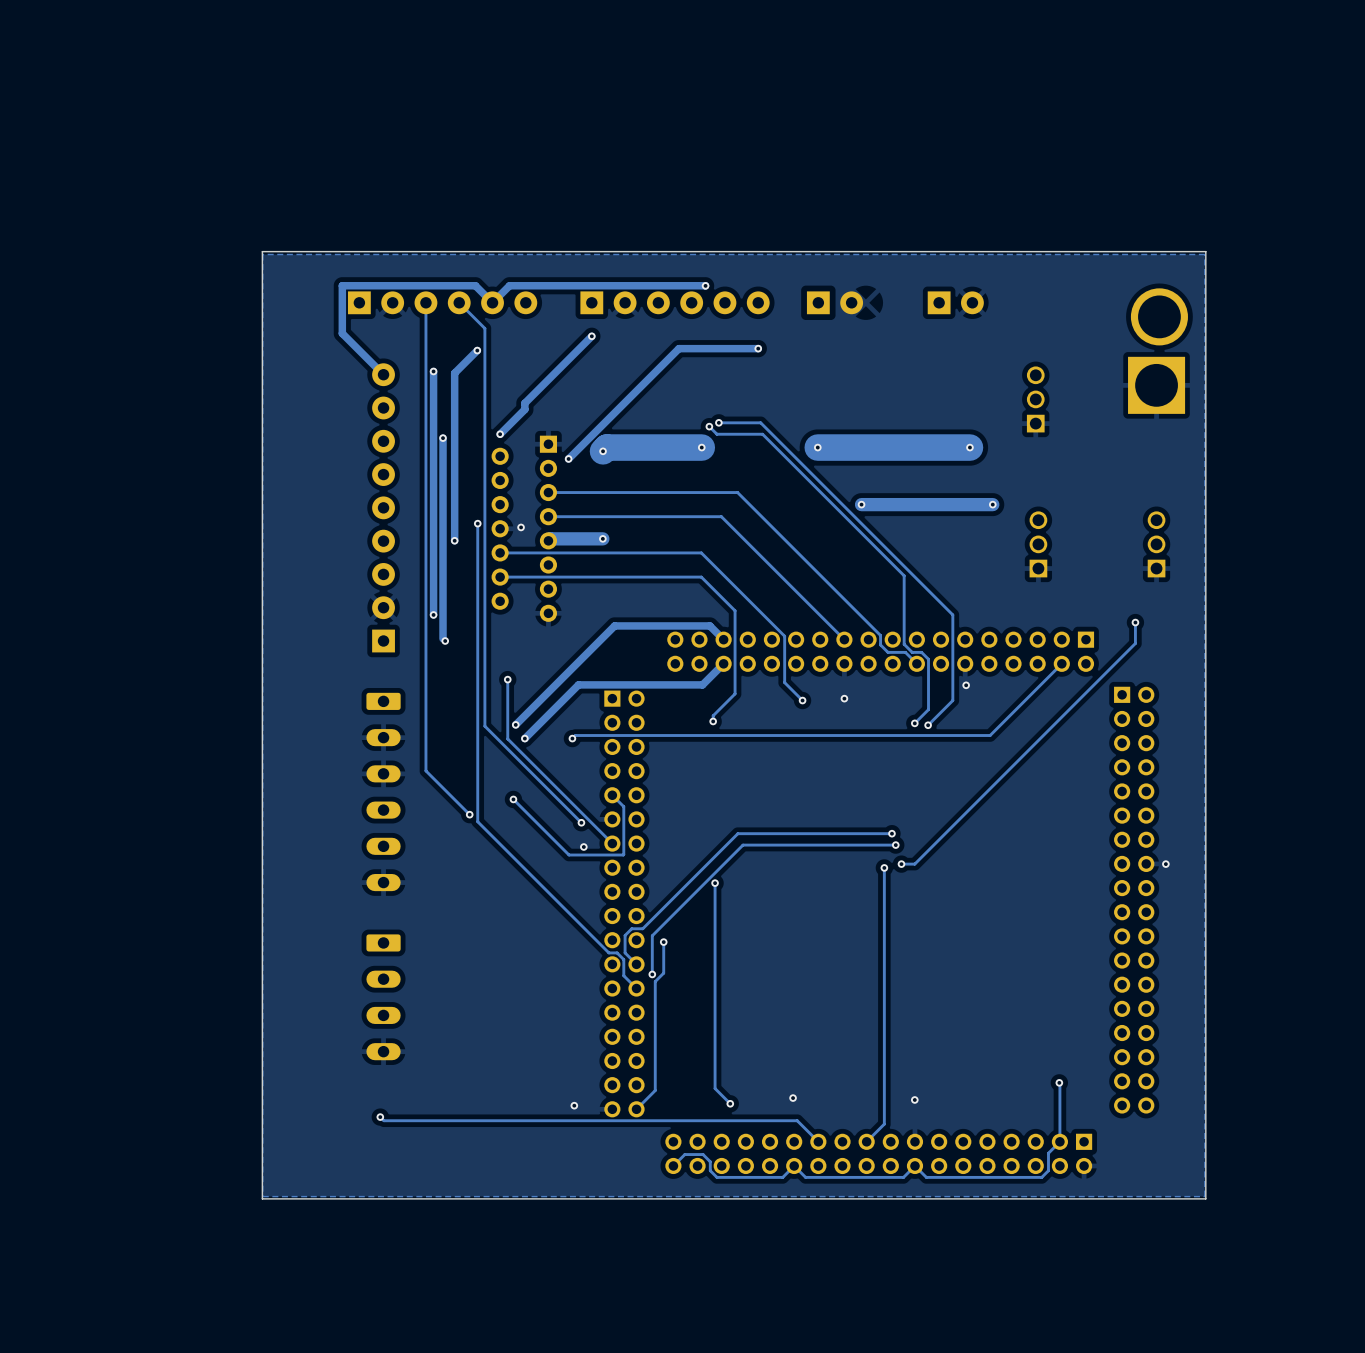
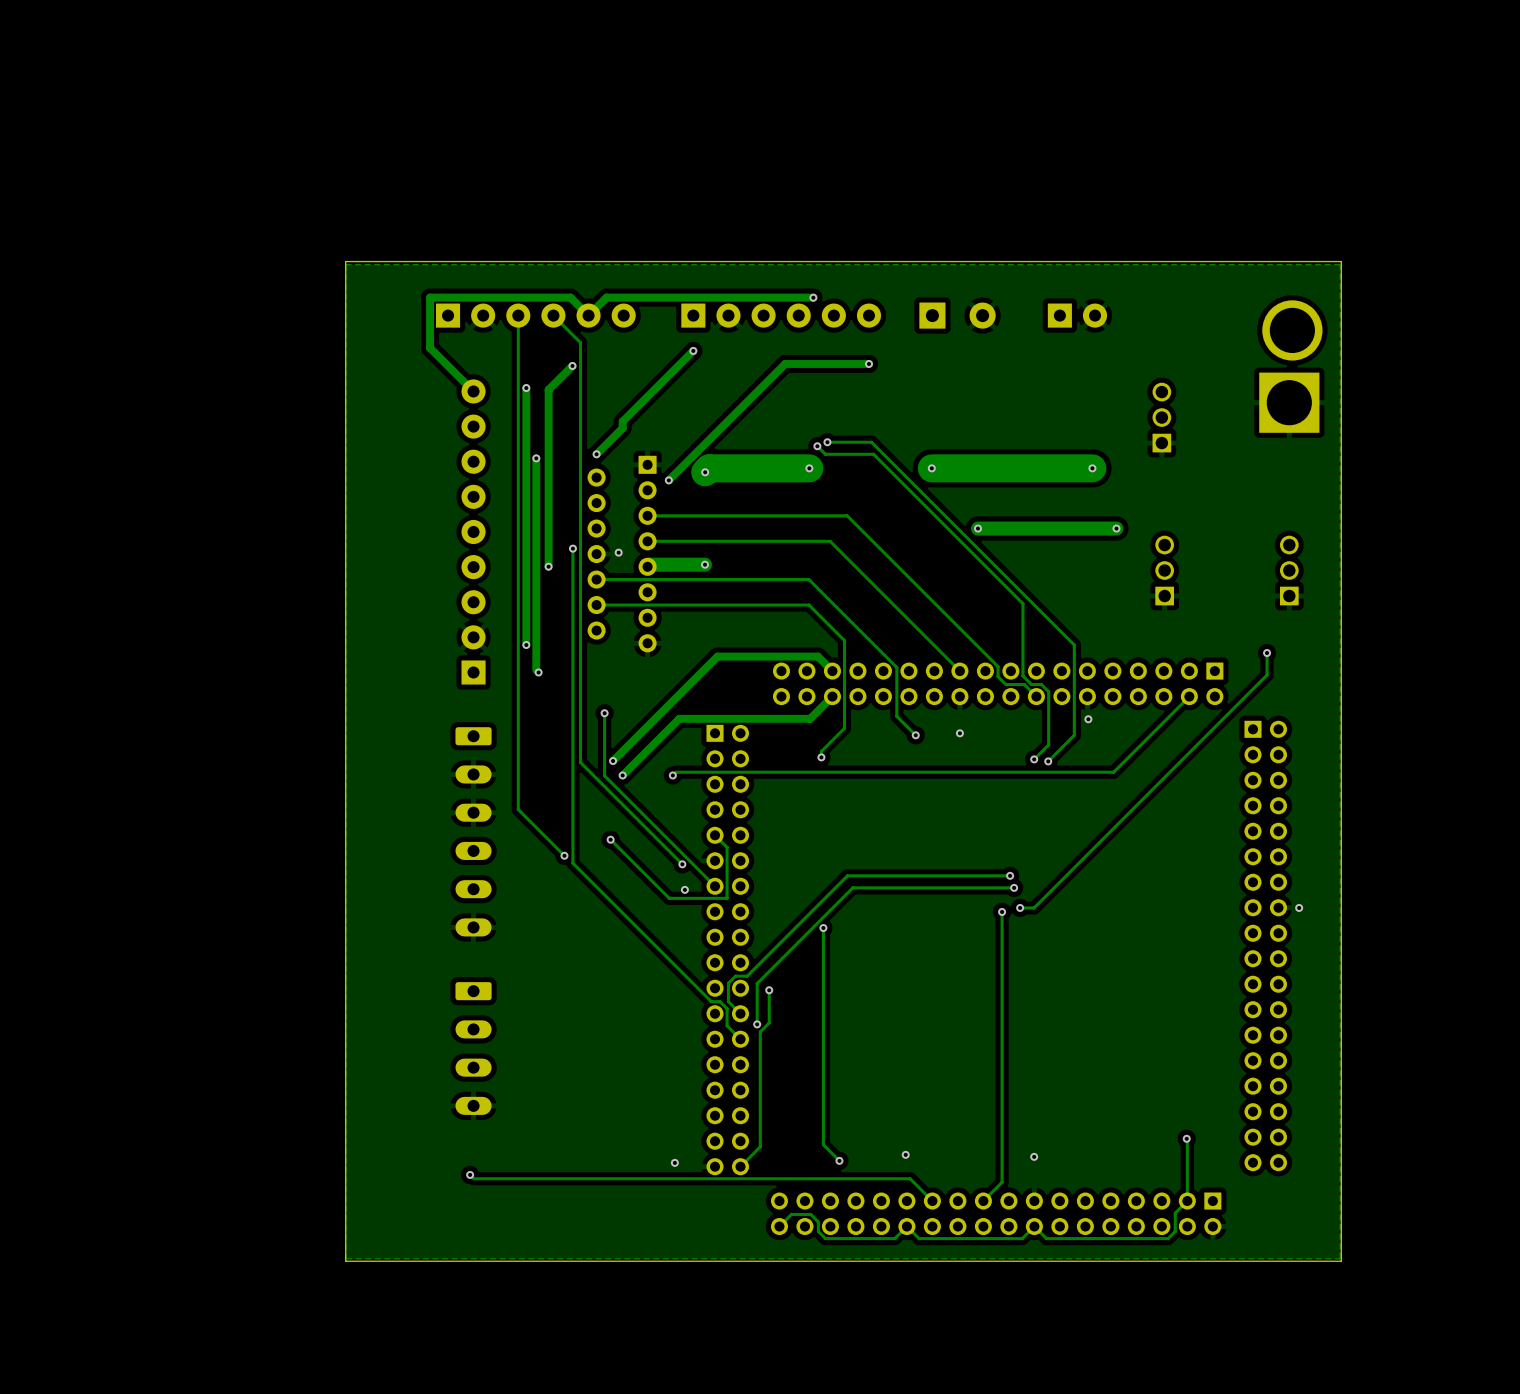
part footprint: [806, 291, 864, 315] -> [919, 302, 996, 329]

